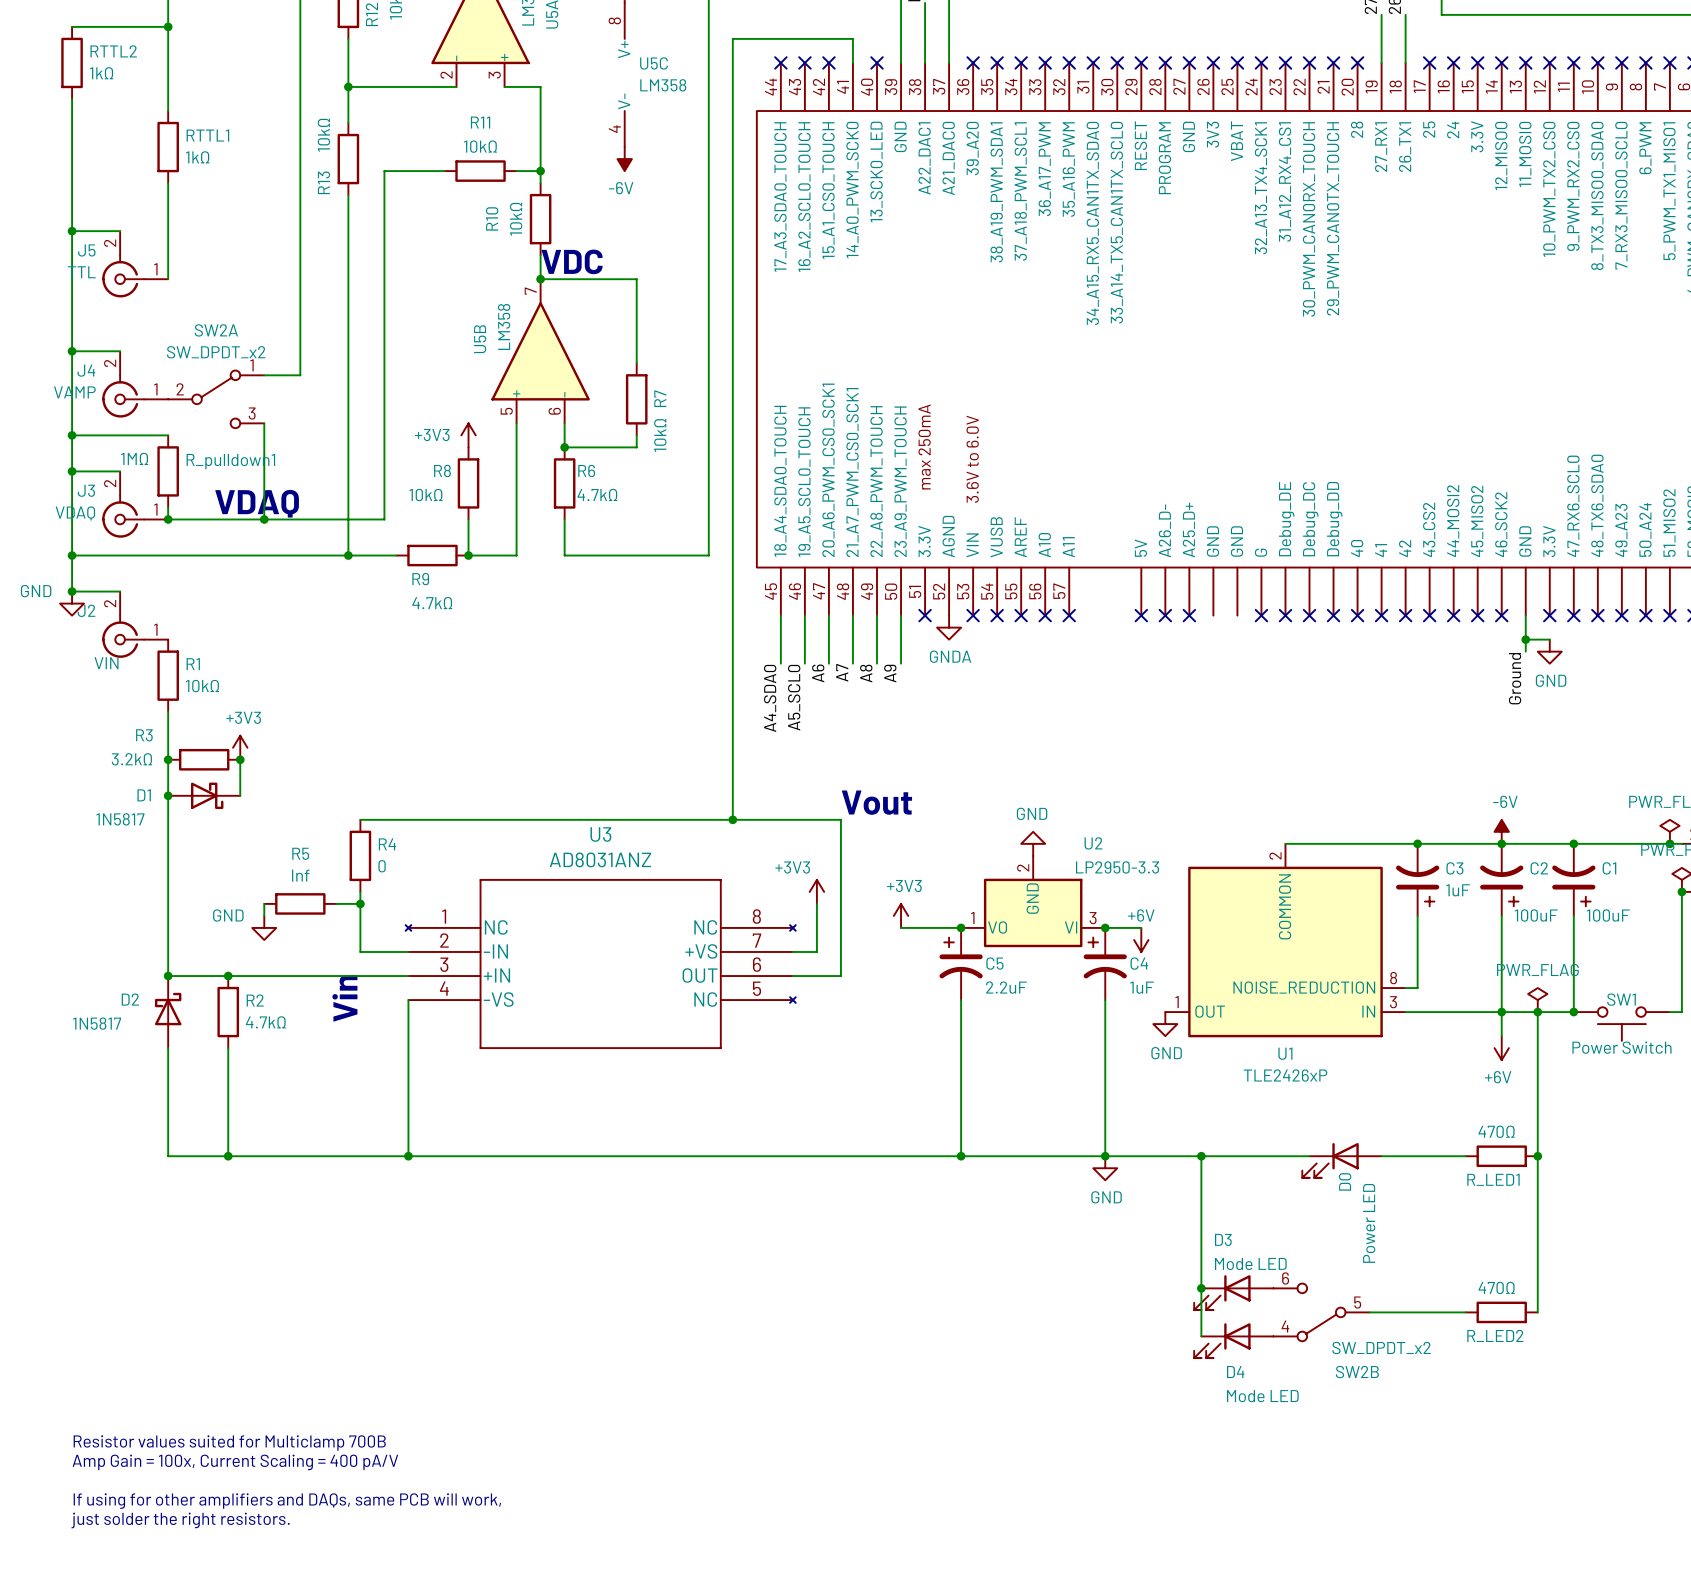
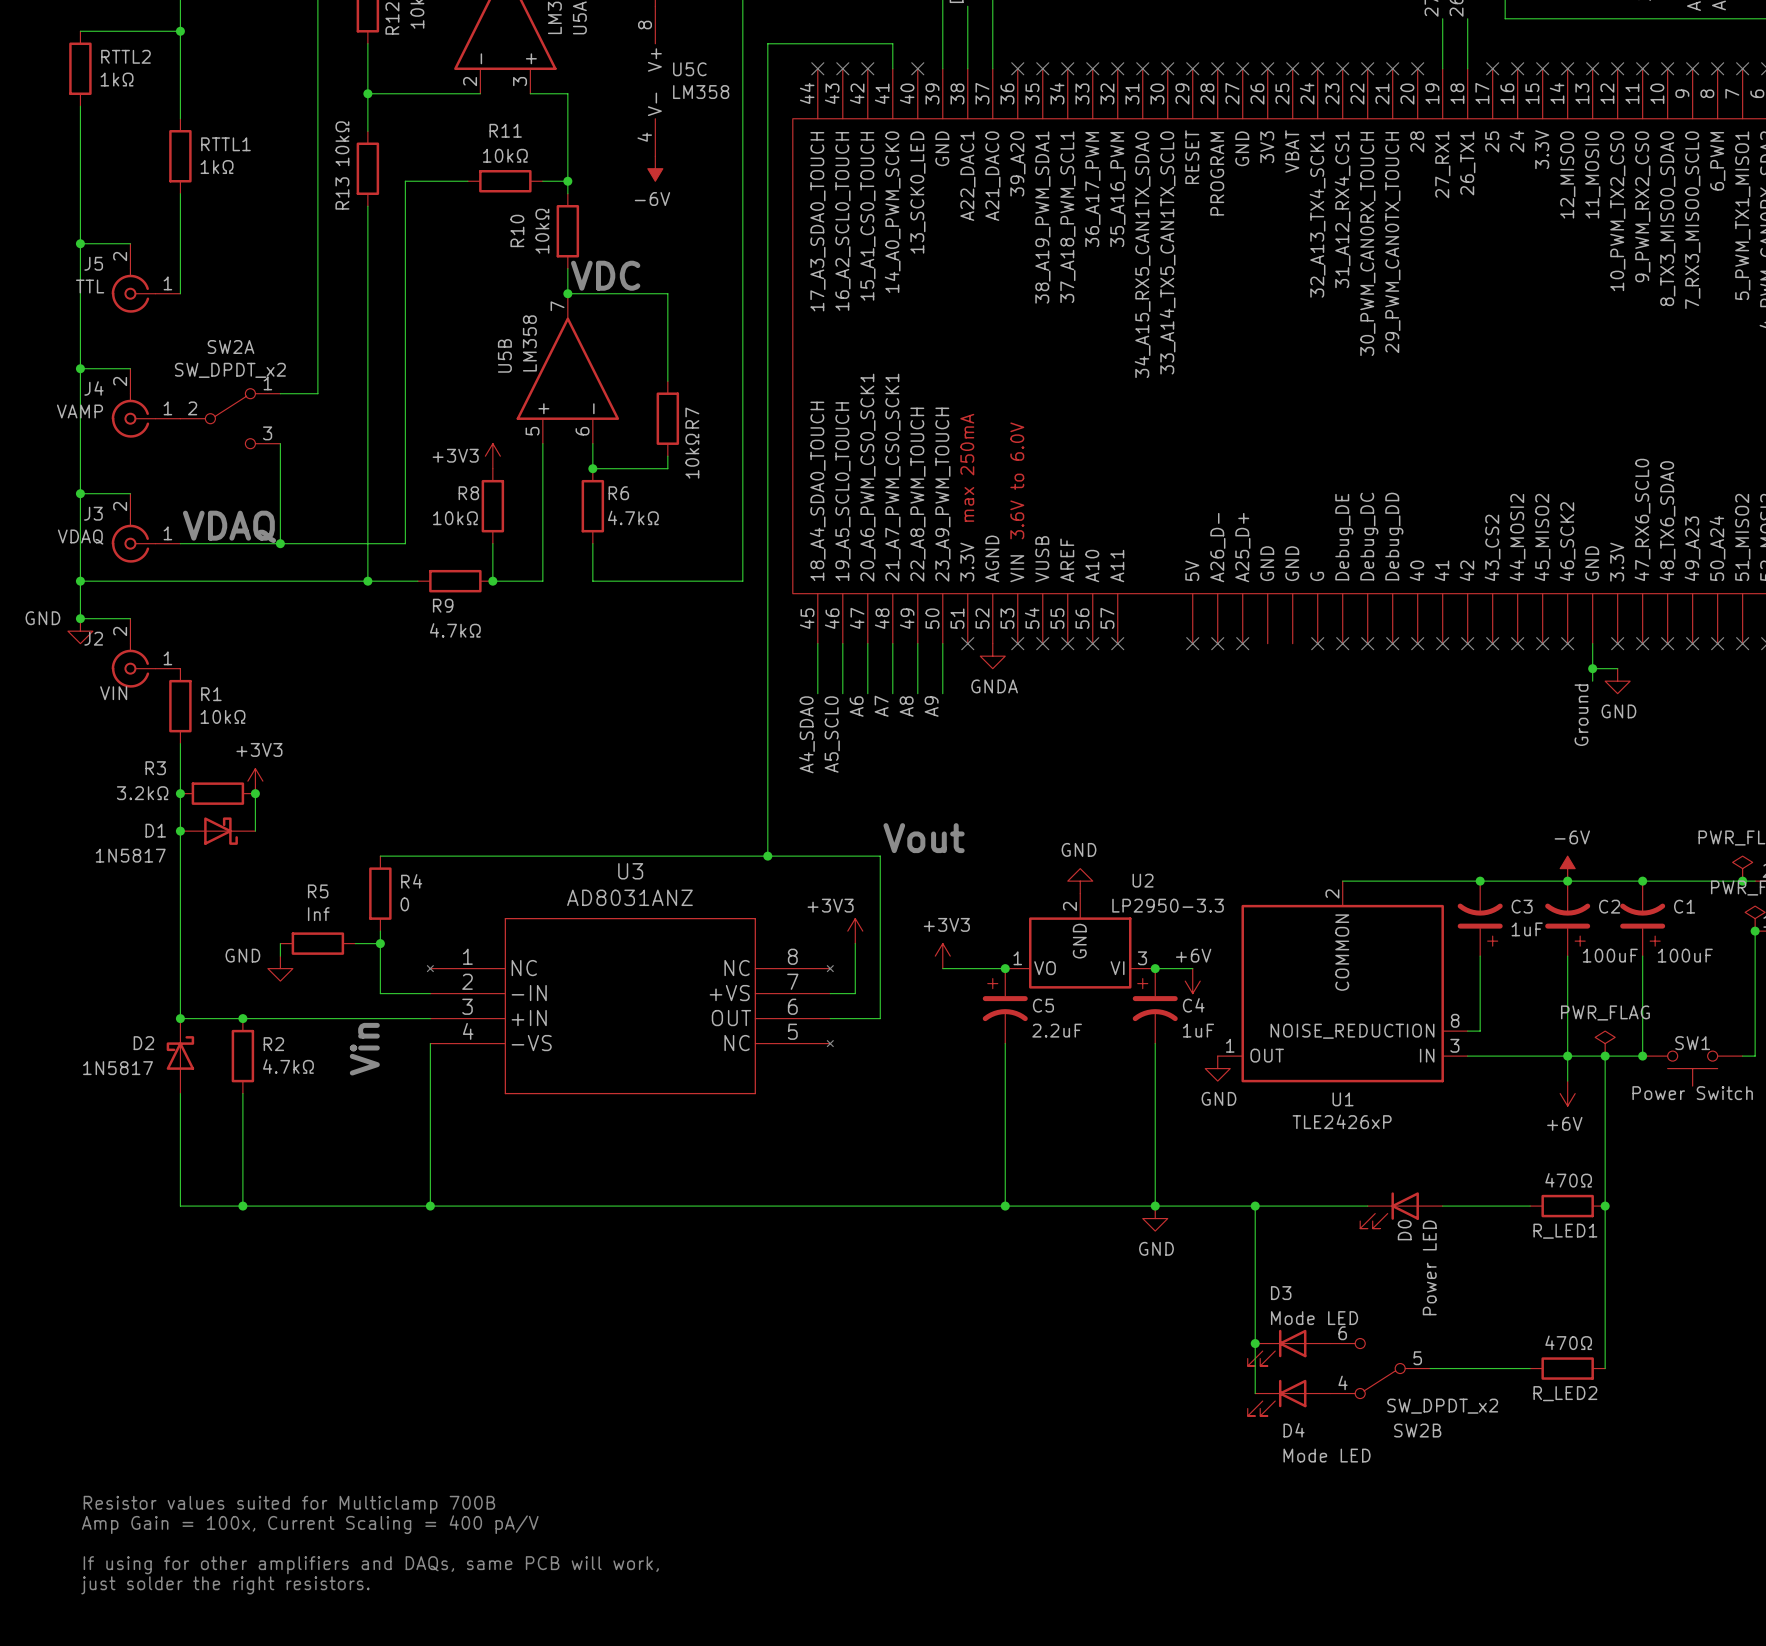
wire: (72, 435) (168, 435) -> none
junction: (72, 435) -> none
R_pulldown1: 1MΩ (168, 471) -> none
text position: VDAQ (257, 503) -> VDAQ (229, 526)
wire: (168, 507) (168, 519) -> none
junction: (168, 519) -> none

